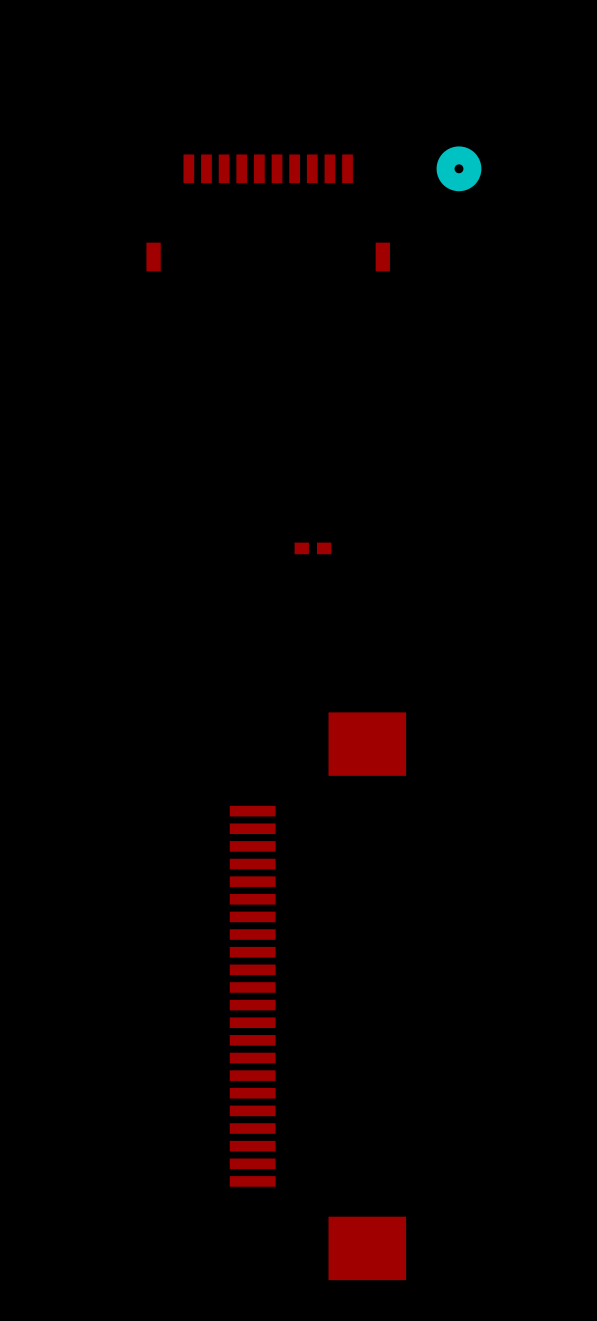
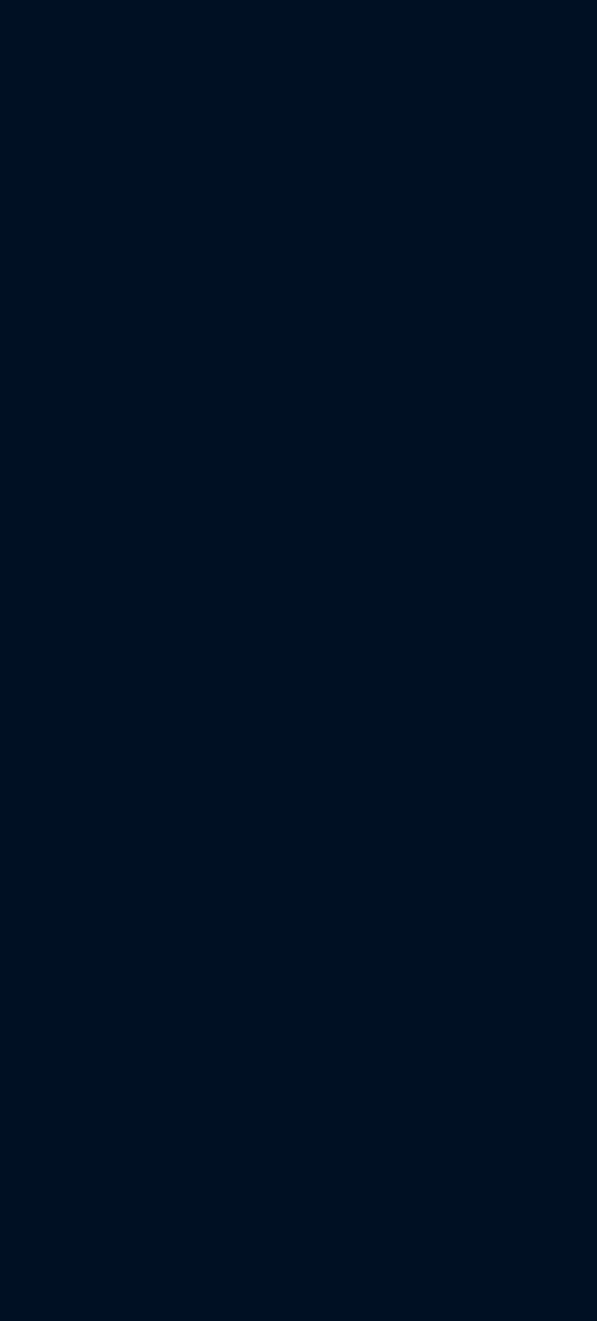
part: (313, 208) -> none
part: (312, 548) -> none
part: (317, 996) -> none

